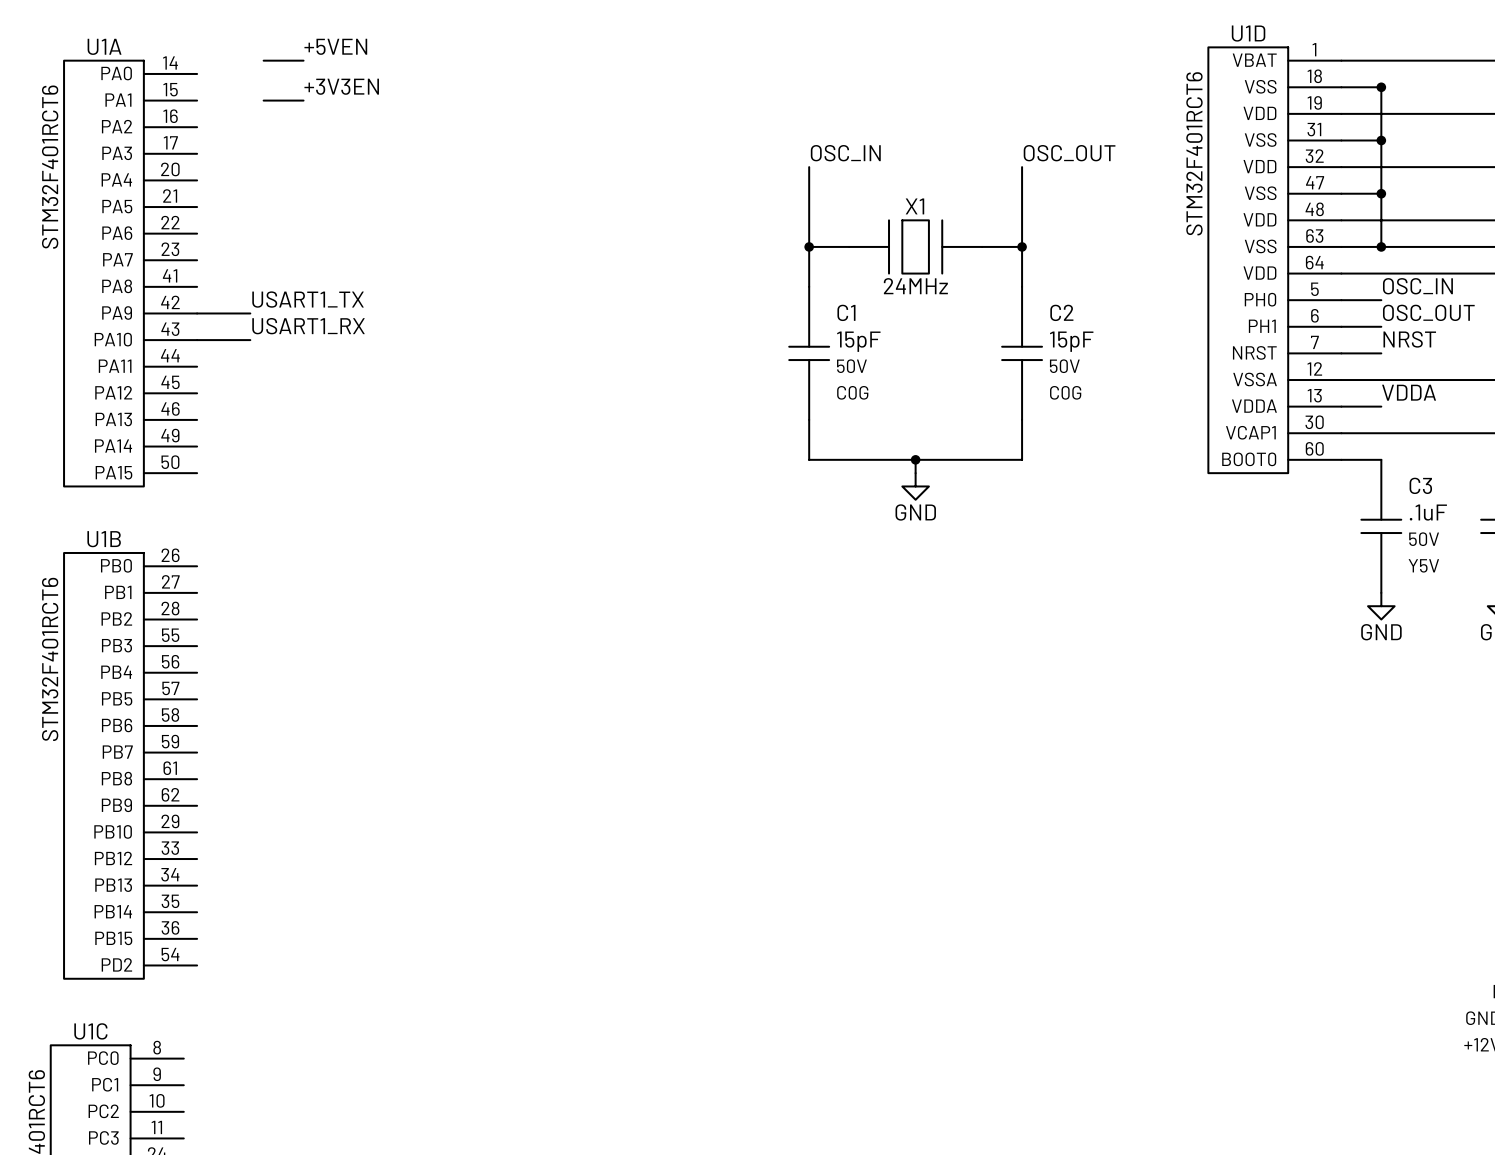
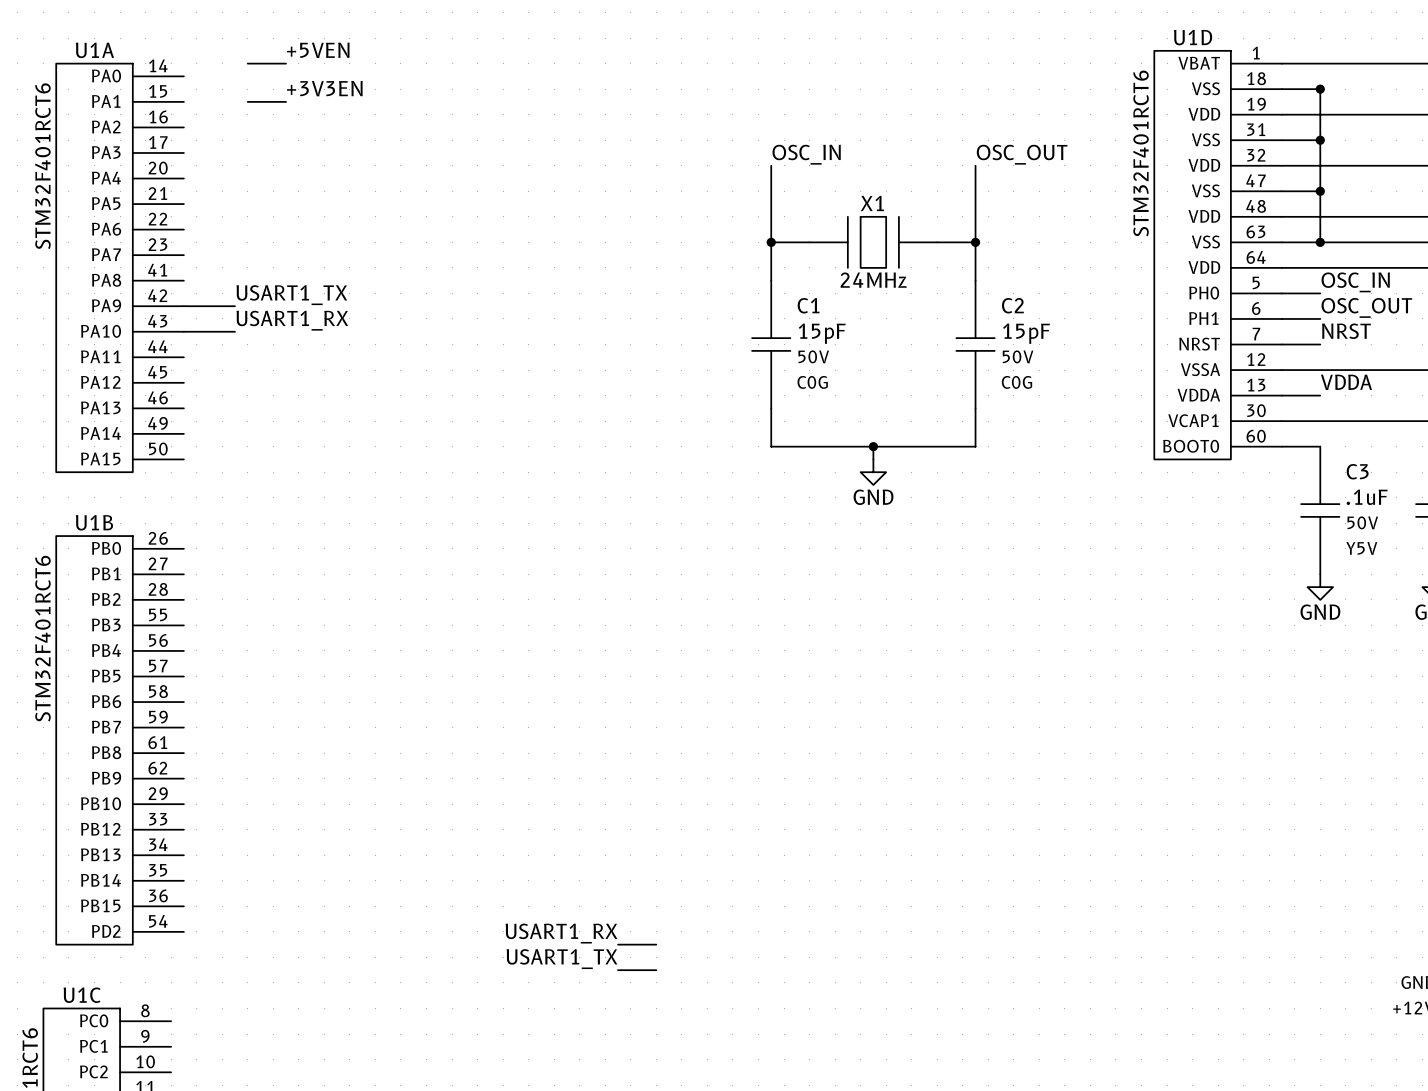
label: none -> USART1_RX (561, 933)
wire: none -> (618, 944) (656, 944)
label: none -> USART1_TX (561, 959)
wire: none -> (618, 970) (656, 970)

